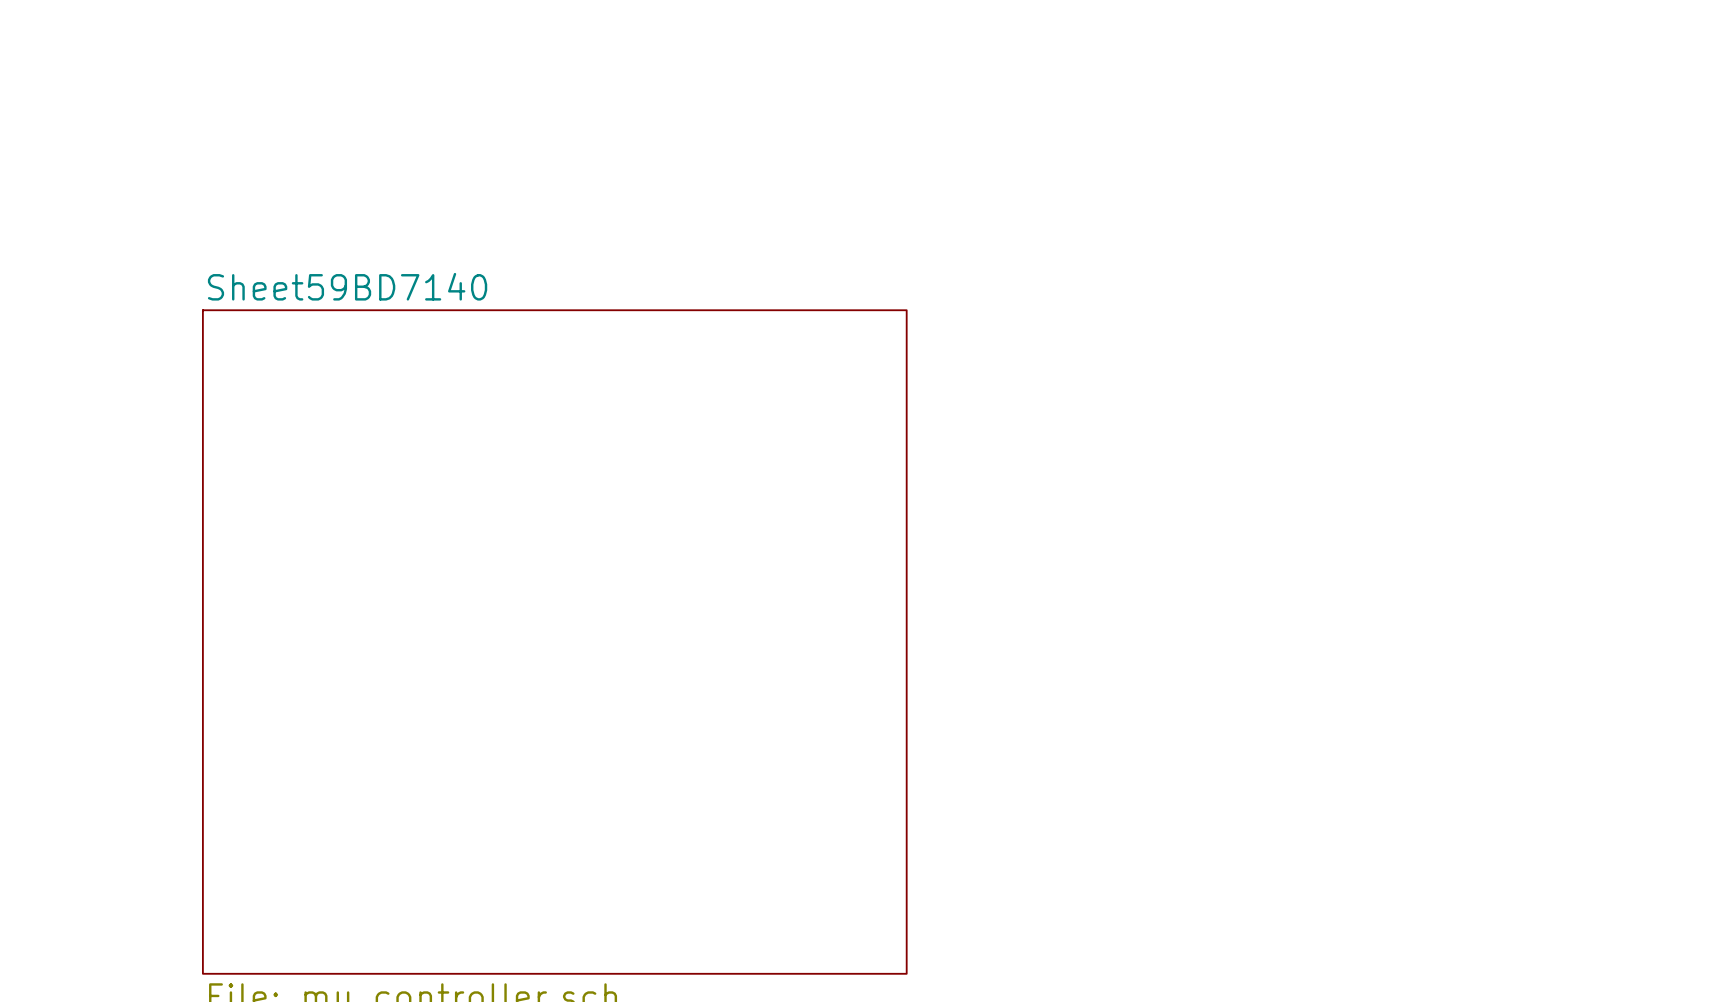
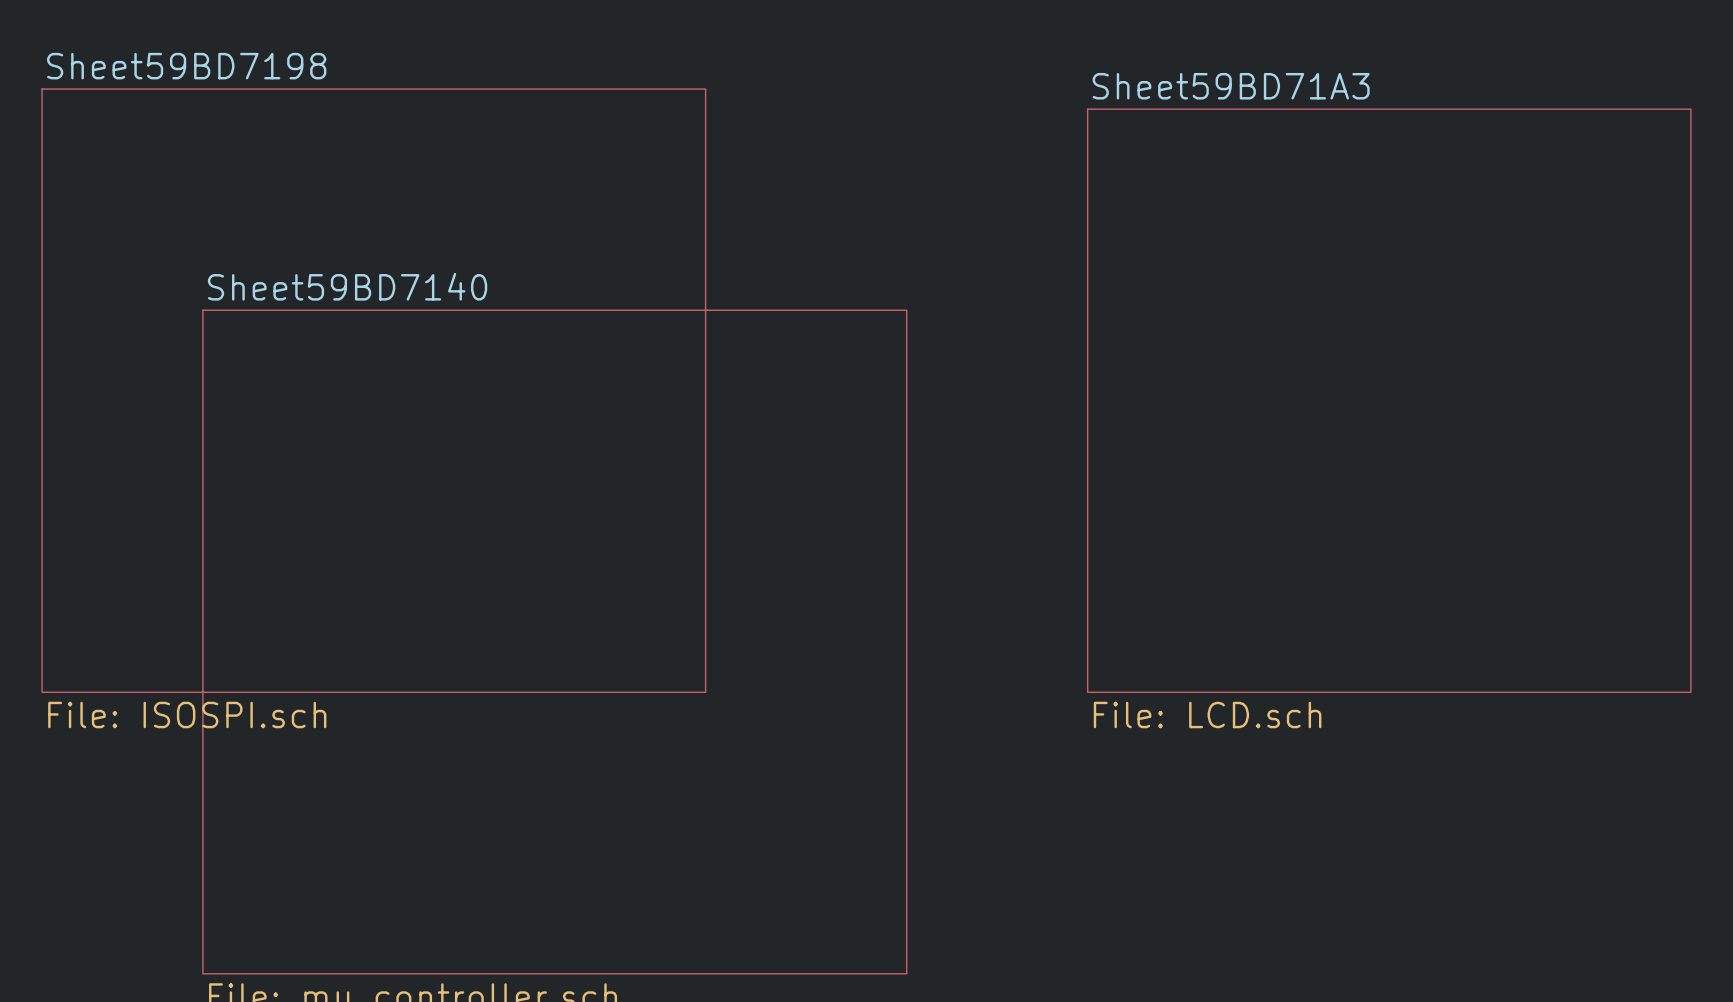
sheet Sheet59BD7198: none -> File: ISOSPI.sch (373, 390)
sheet Sheet59BD71A3: none -> File: LCD.sch (1389, 400)

